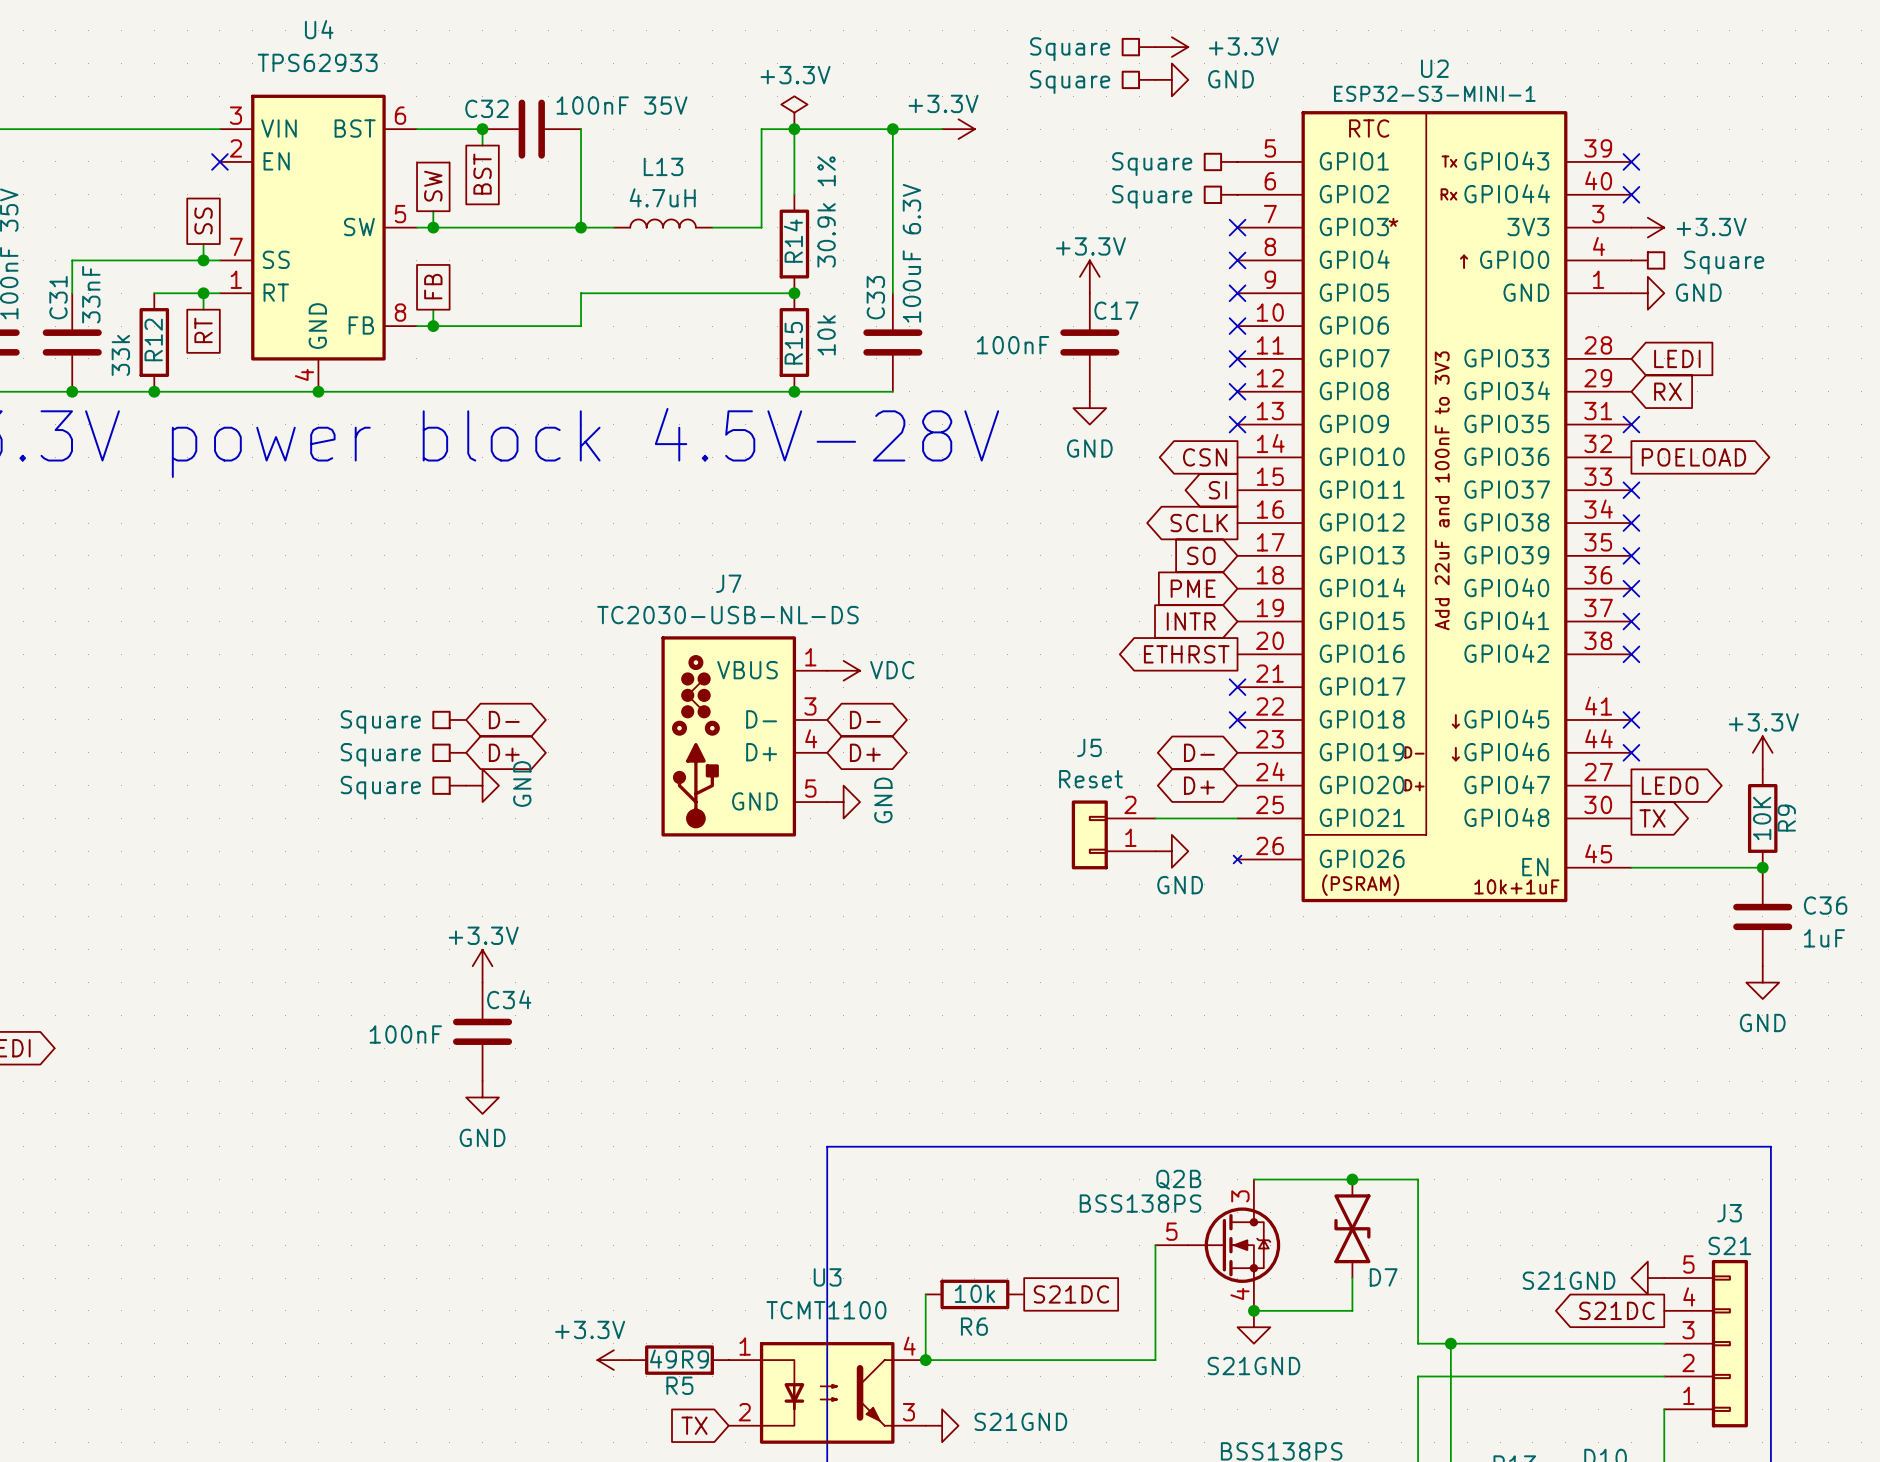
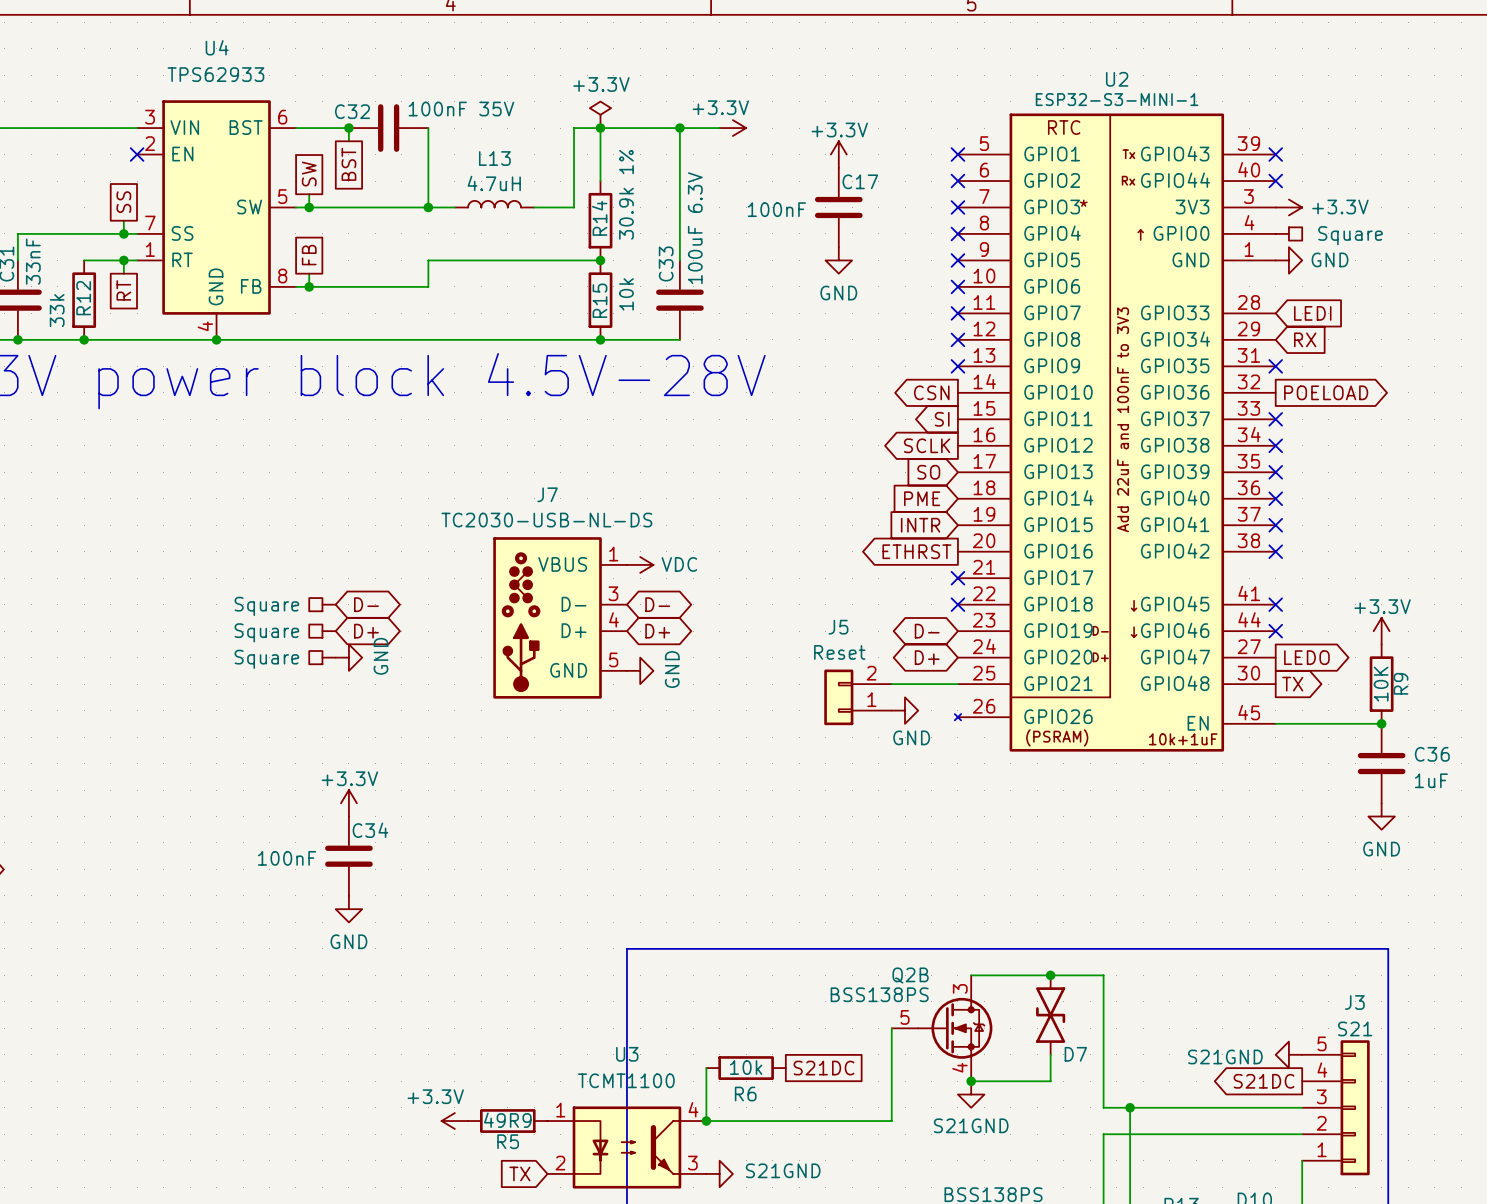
part: Square (1138, 47) -> none
power symbol: +3.3V (1171, 47) -> none
part: Square (1138, 79) -> none
power symbol: GND (1171, 79) -> none
power symbol: none -> +3.3V (838, 154)
part: Square (1220, 161) -> none
no-connect mark: none -> (957, 154)
part: Square (1220, 194) -> none
no-connect mark: none -> (957, 181)
power symbol: +3.3V (1089, 276) -> none
power symbol: none -> GND (838, 260)
C17 position: (1089, 342) -> (838, 207)
power symbol: GND (1089, 408) -> none

